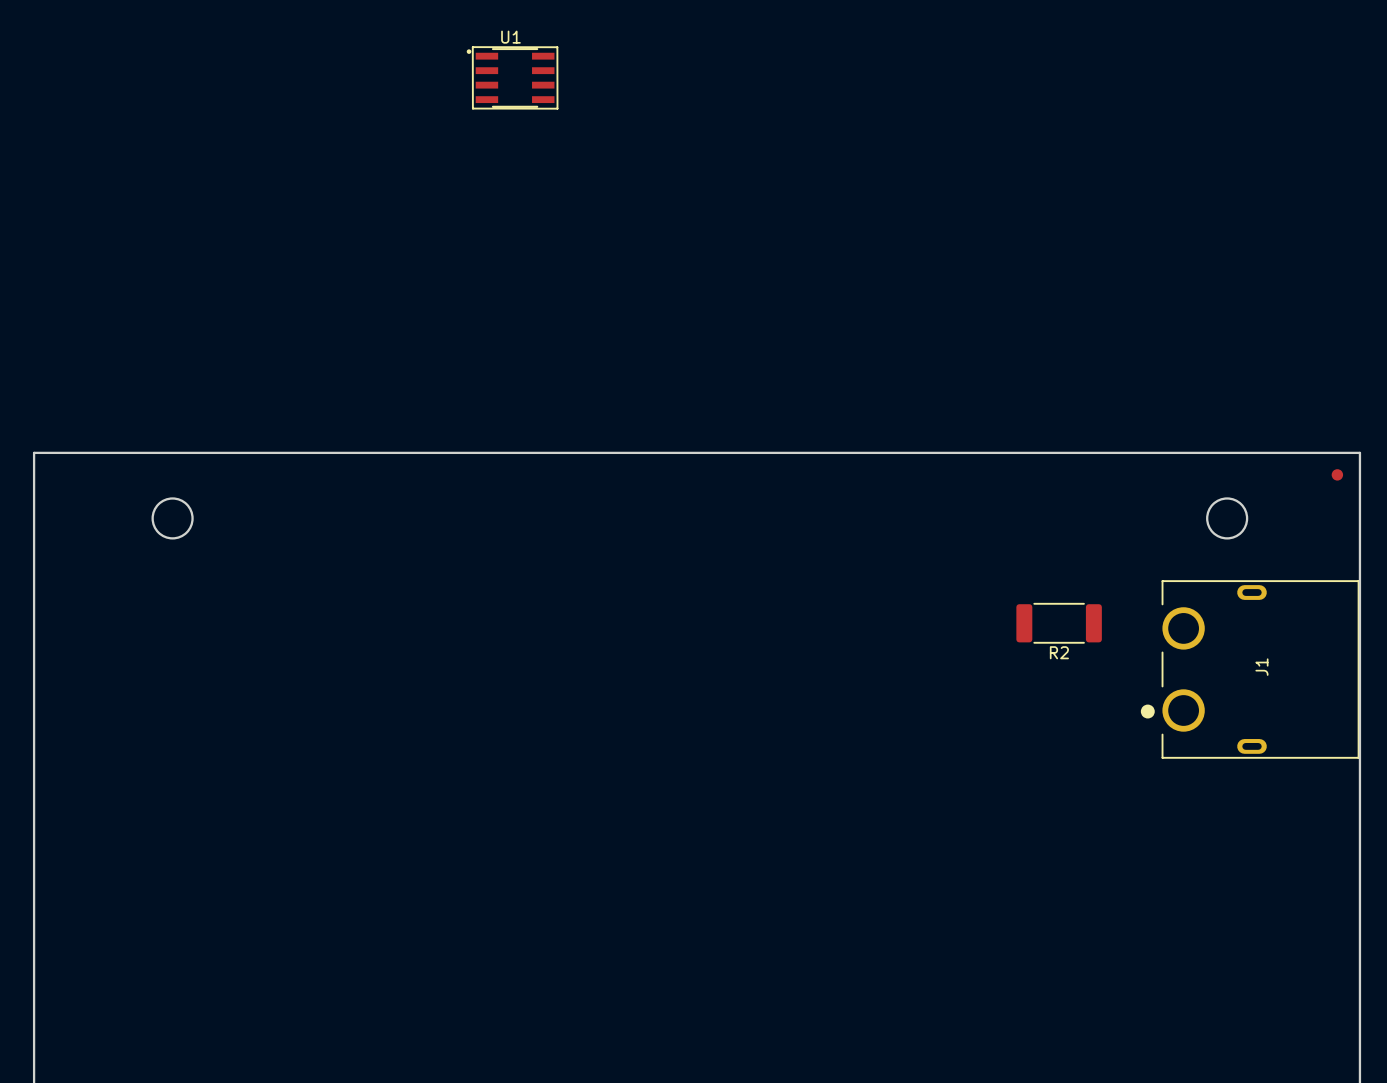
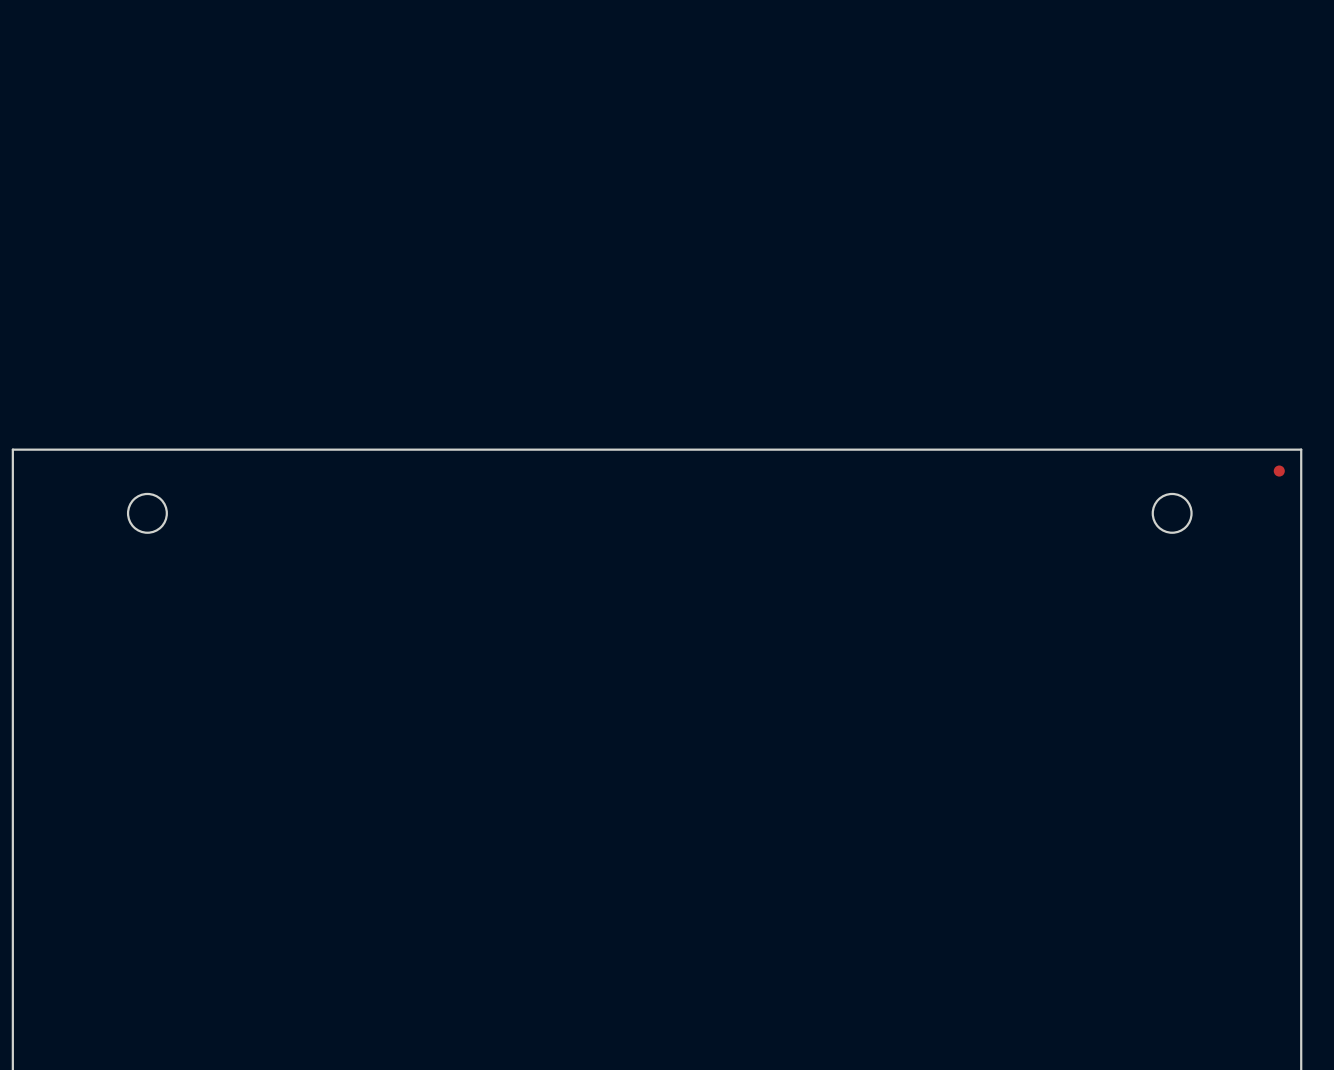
U1: (512, 77) -> none
R2: (1059, 623) -> none
J1: (1250, 669) -> none

